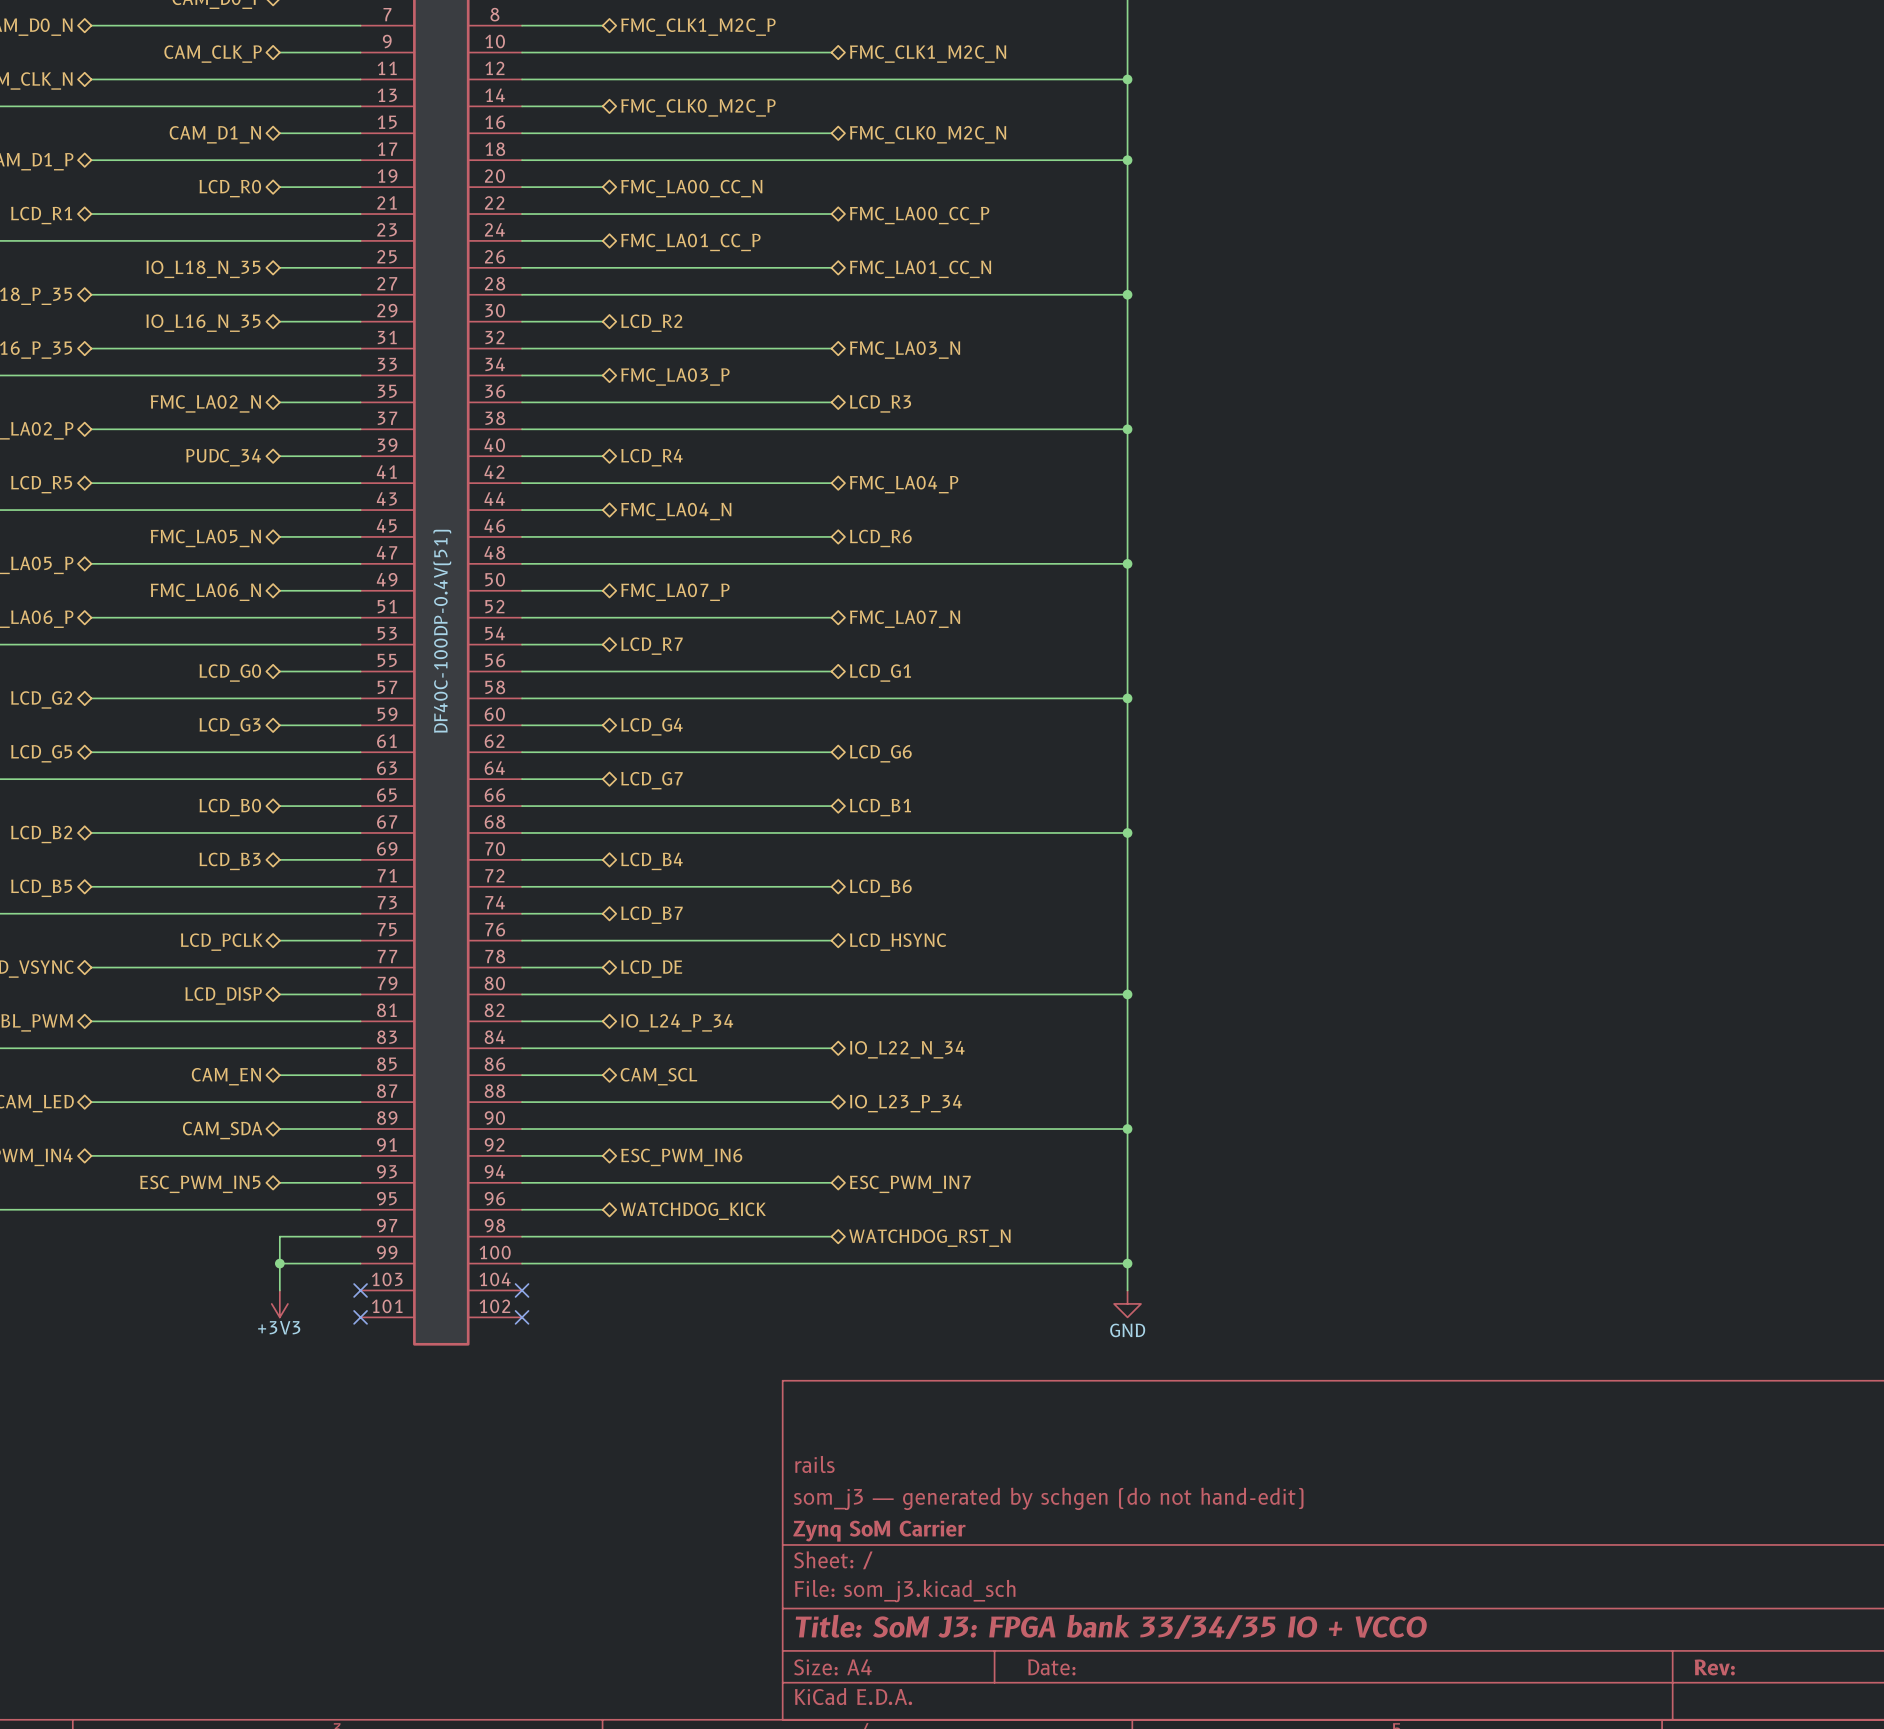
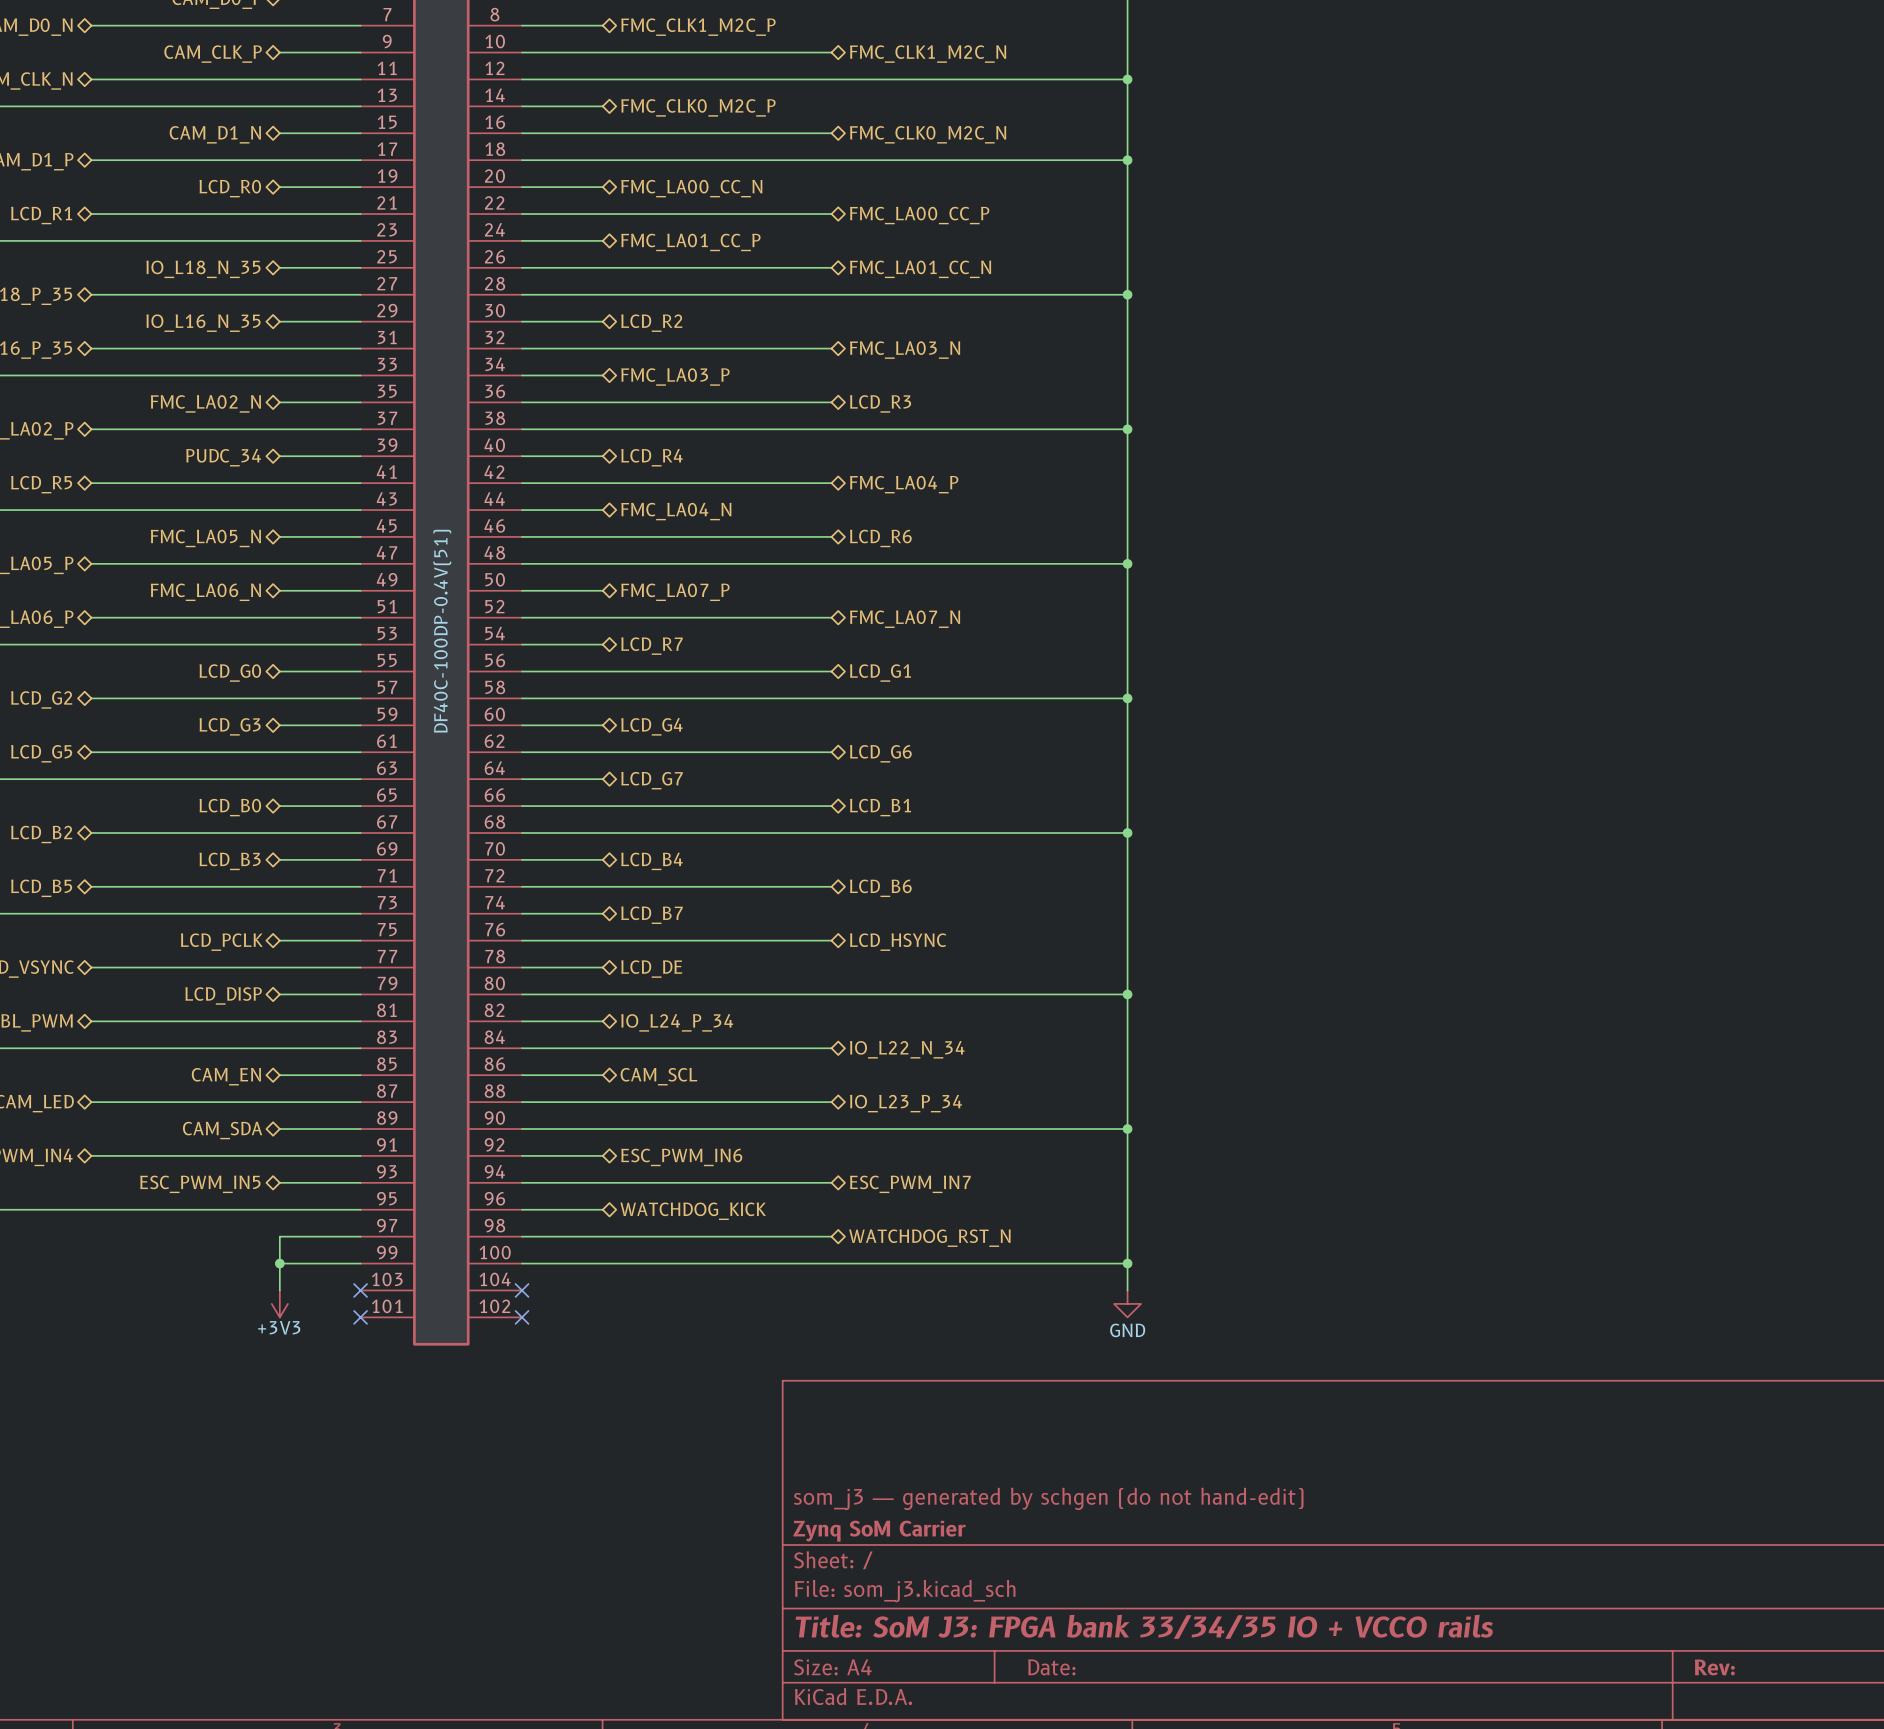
title block: rails (814, 1464) -> none
title block: Title: SoM J3: FPGA bank 33/34/35 IO + VCCO (1111, 1626) -> Title: SoM J3: FPGA bank 33/34/35 IO + VCCO rails (1144, 1626)

